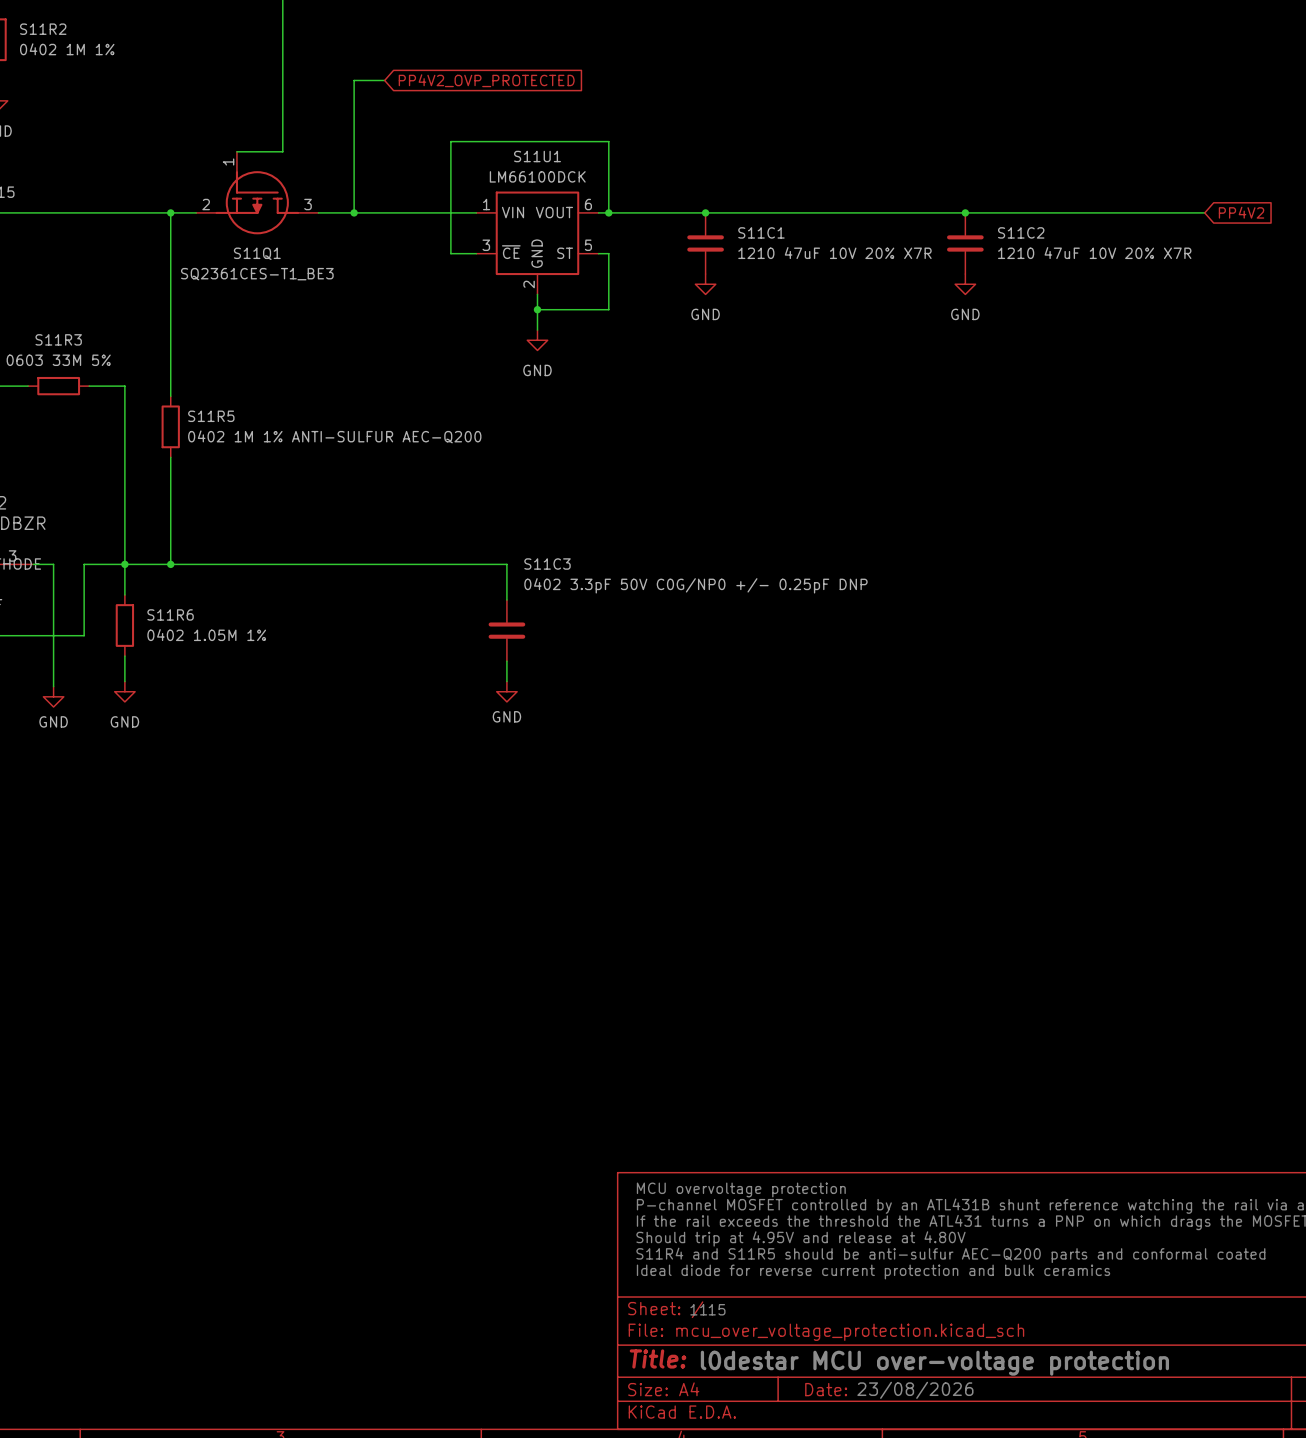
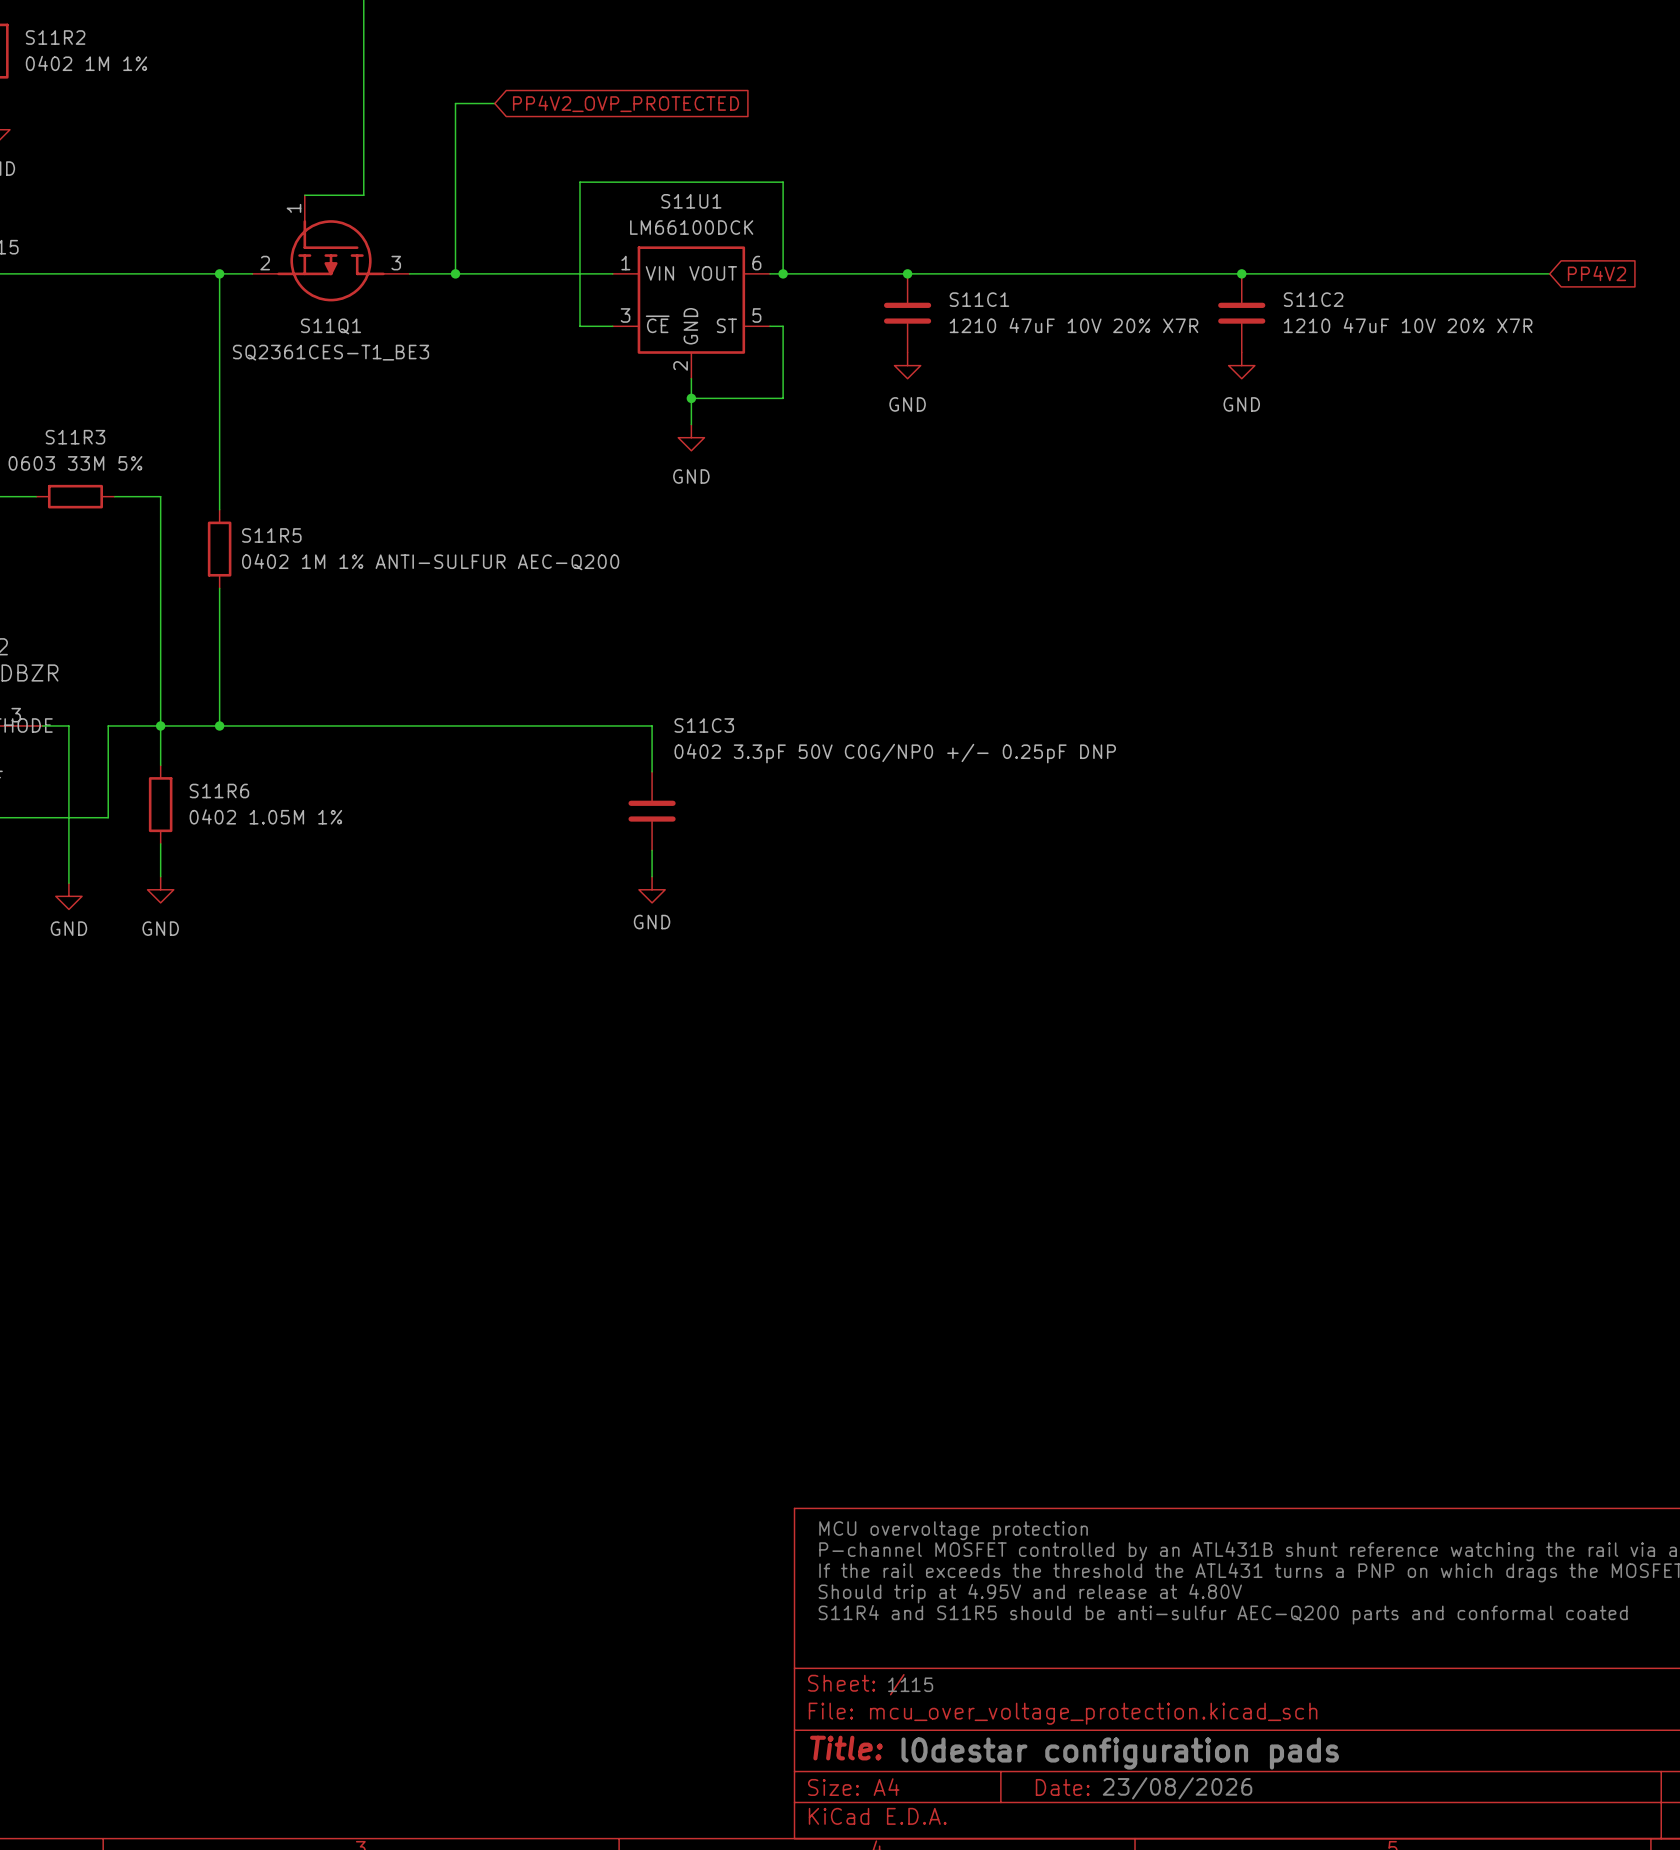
text: Ideal diode for reverse current protection and bulk ceramics (873, 1271) -> none
text: l0destar MCU over-voltage protection (934, 1363) -> l0destar configuration pads (1120, 1753)

